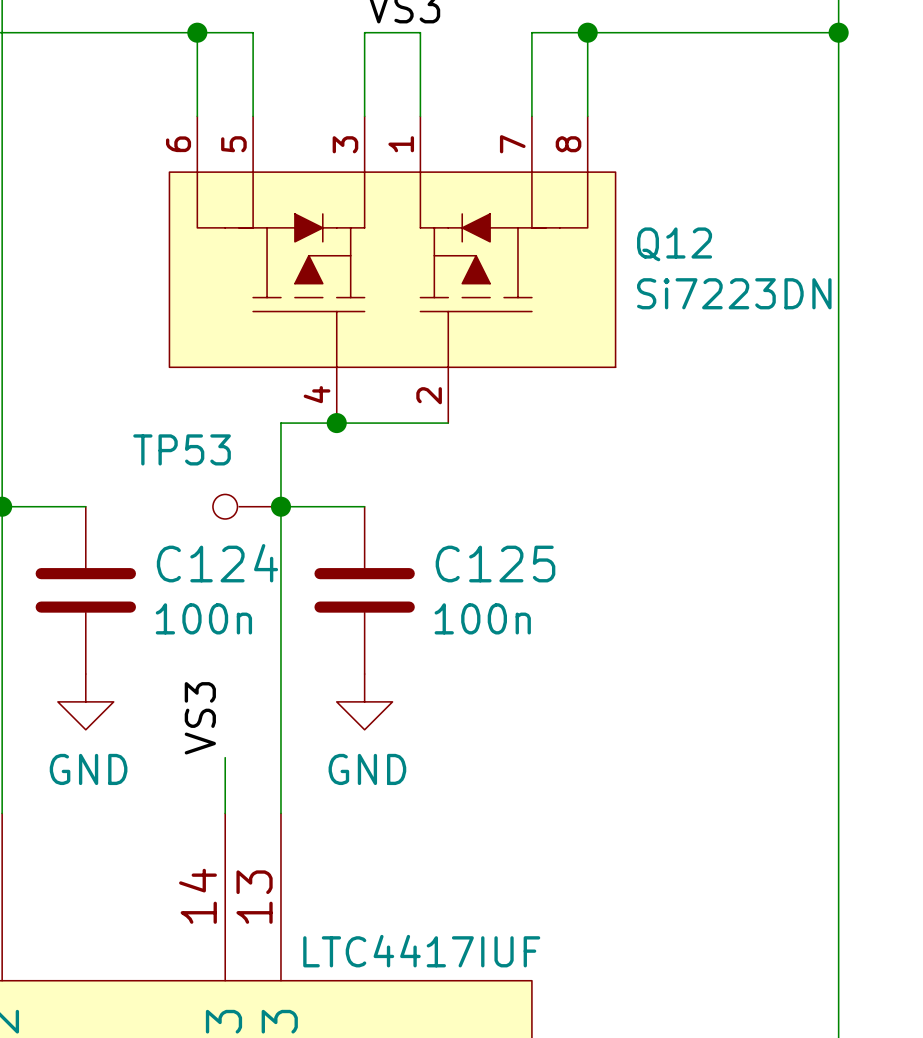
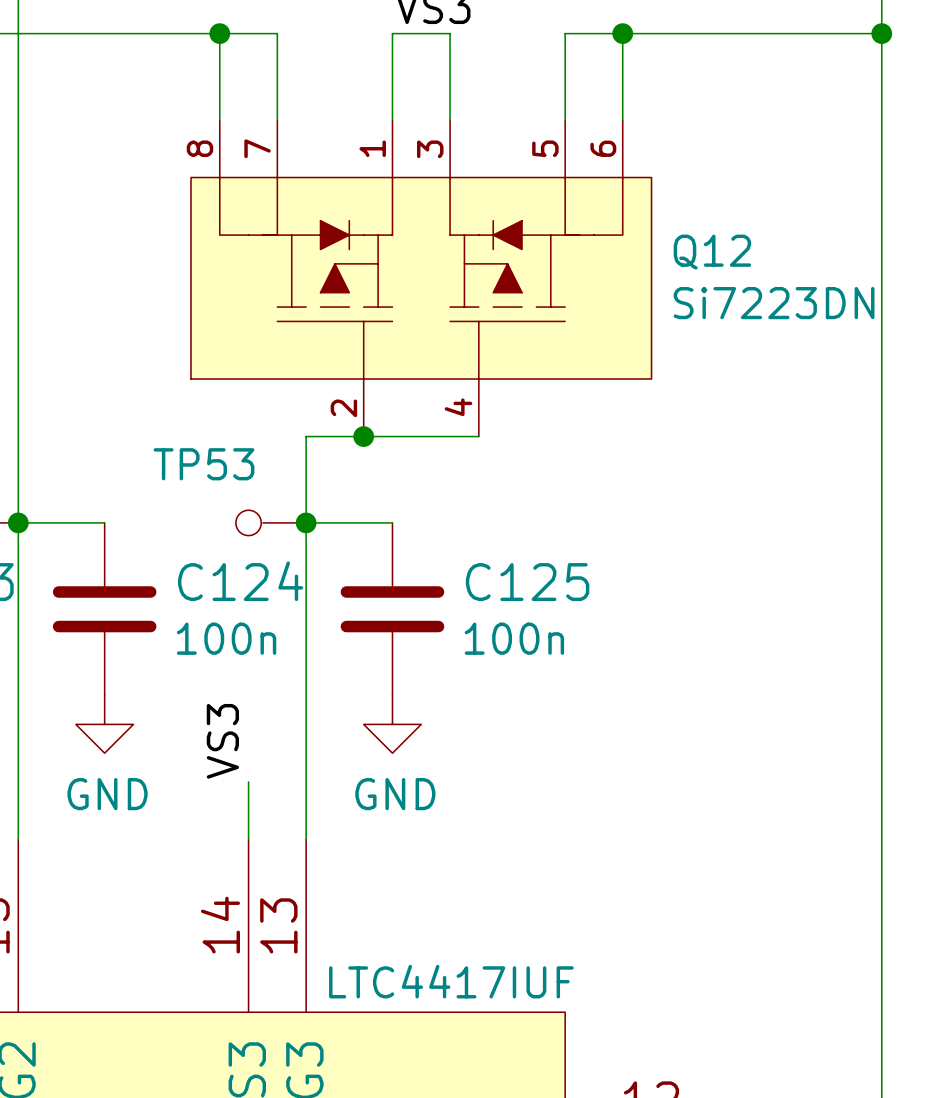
Q12 flip: as is (392, 269) -> left-right (421, 278)

